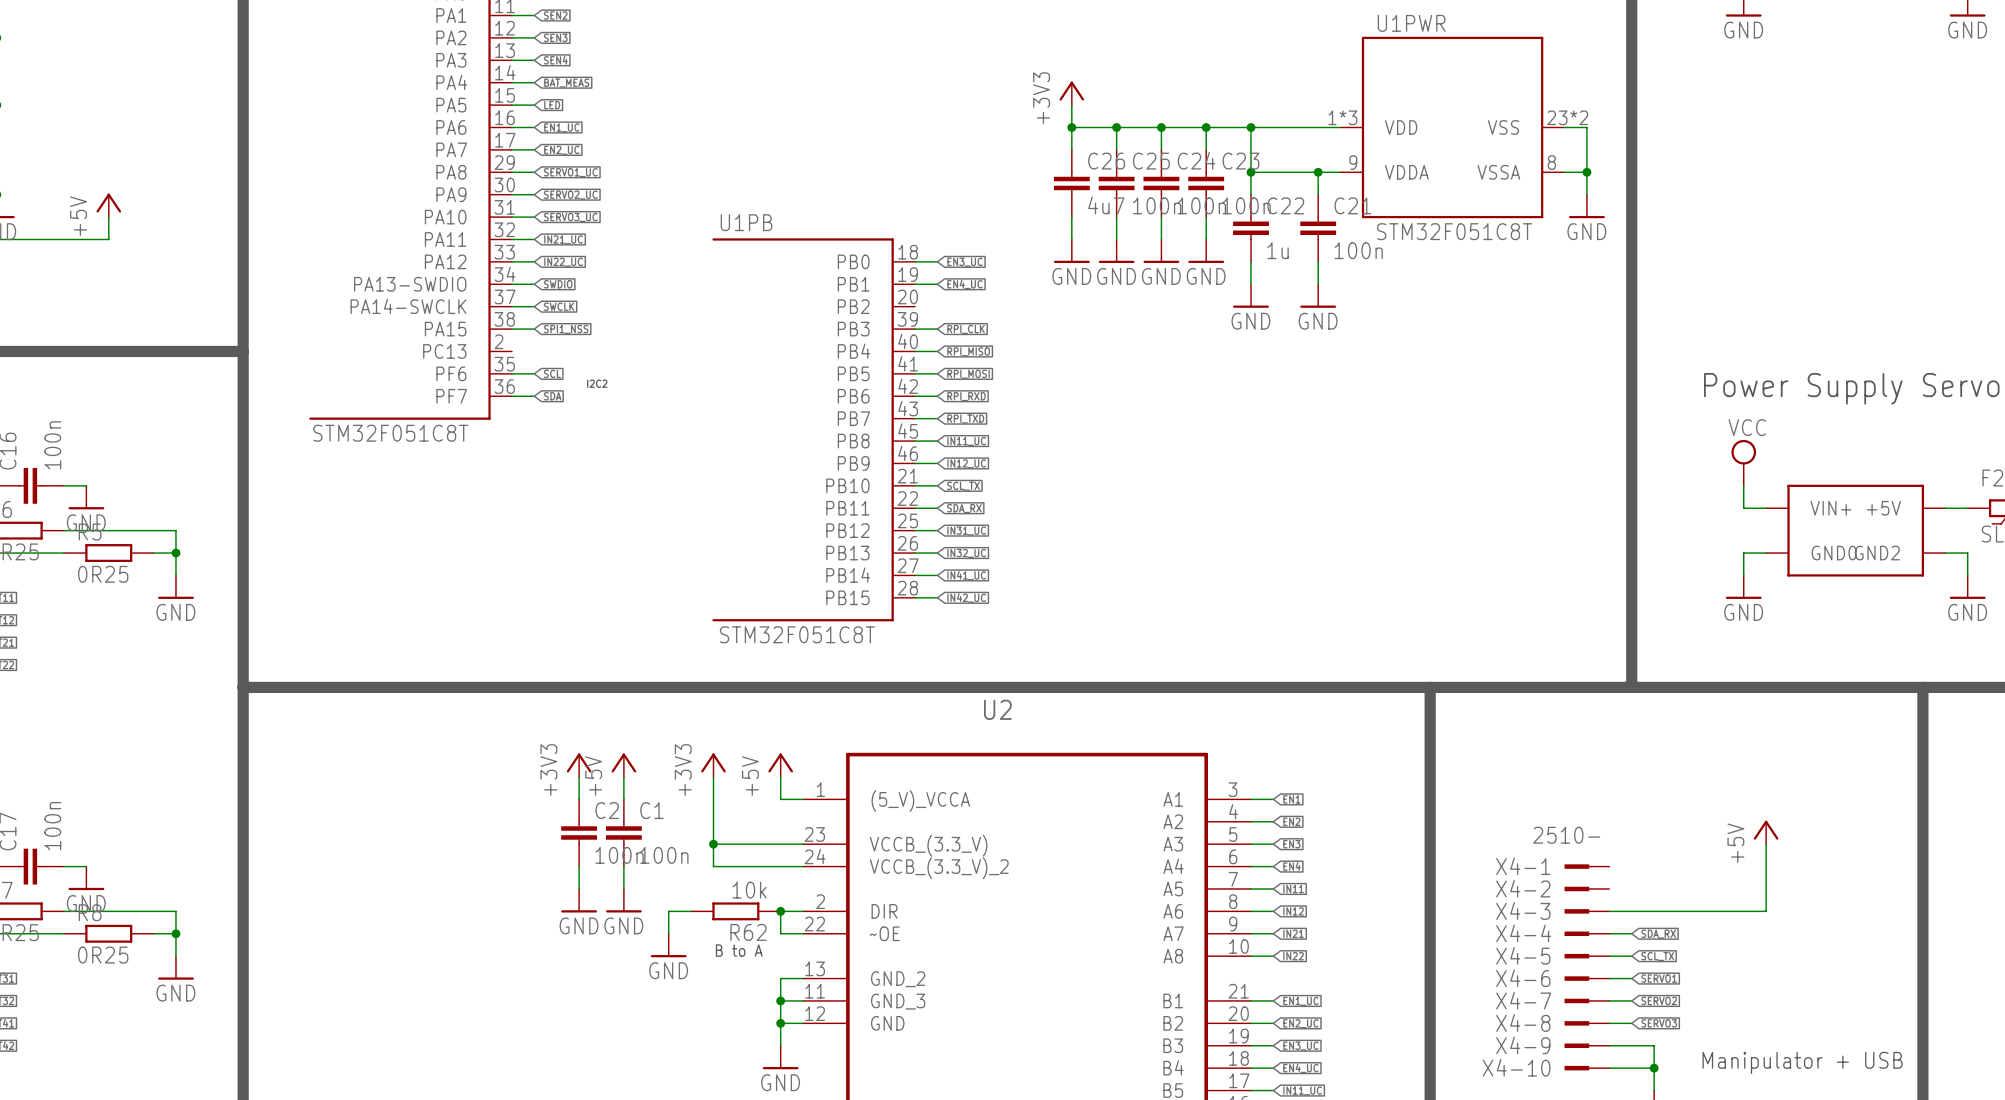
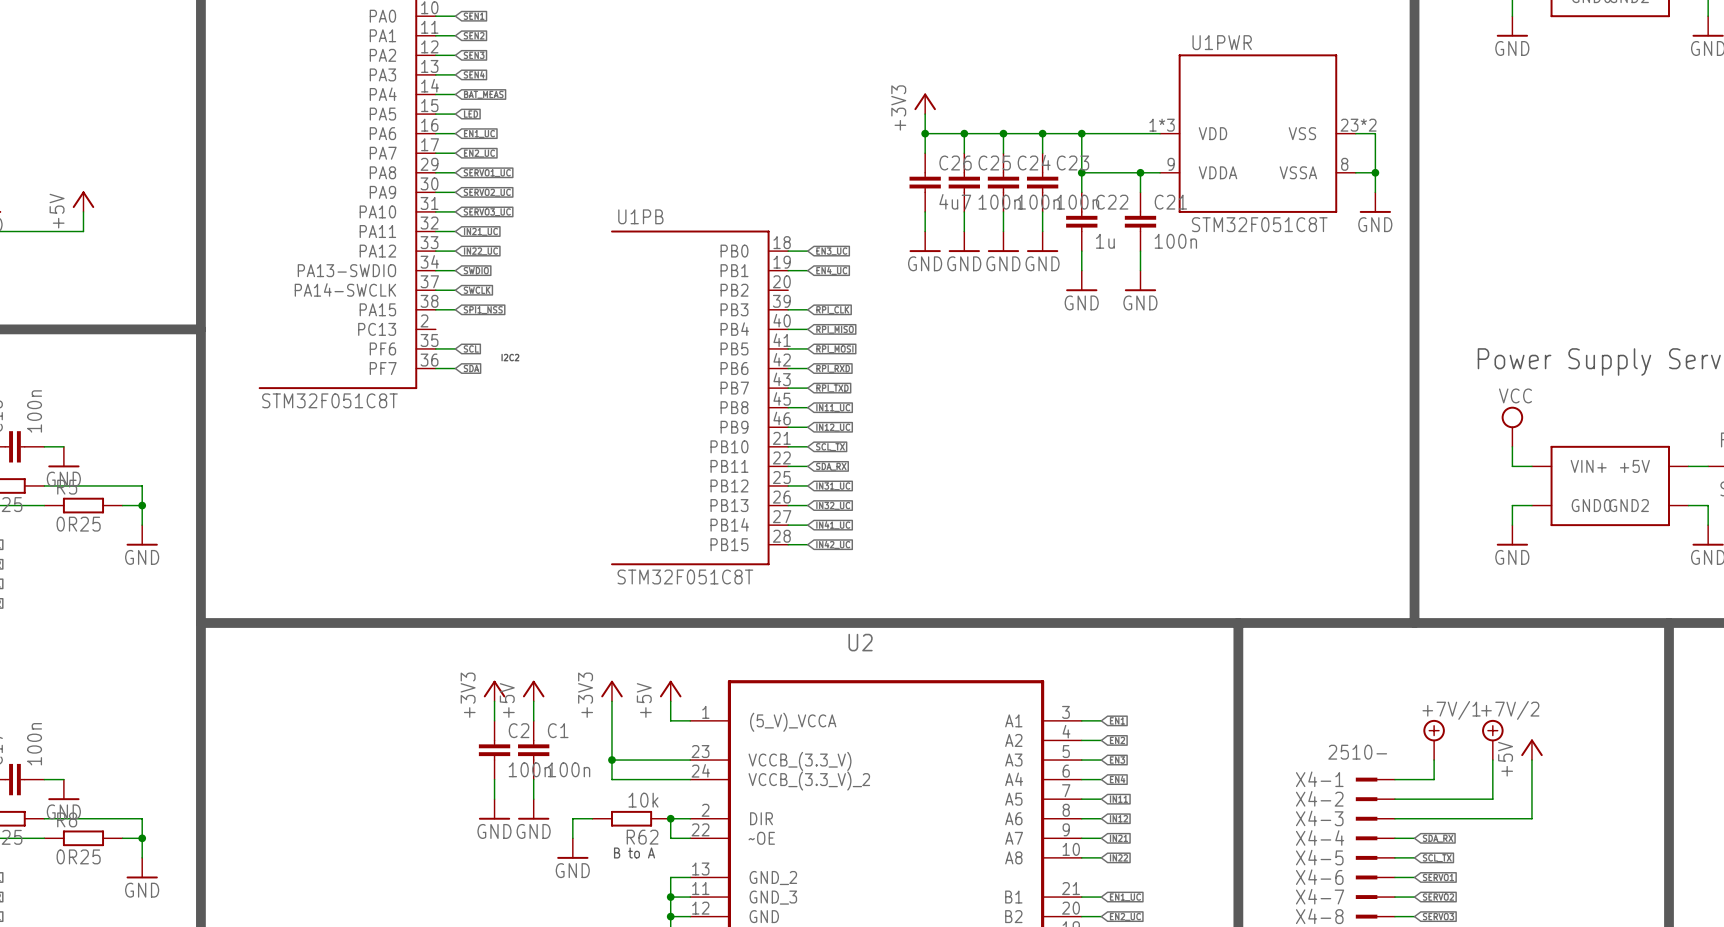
power symbol: none -> +7V/1 (1434, 739)
power symbol: none -> +7V/2 (1492, 739)
wire: none -> (1434, 760) (1434, 779) (1394, 779)
wire: none -> (1492, 760) (1492, 799) (1394, 799)

